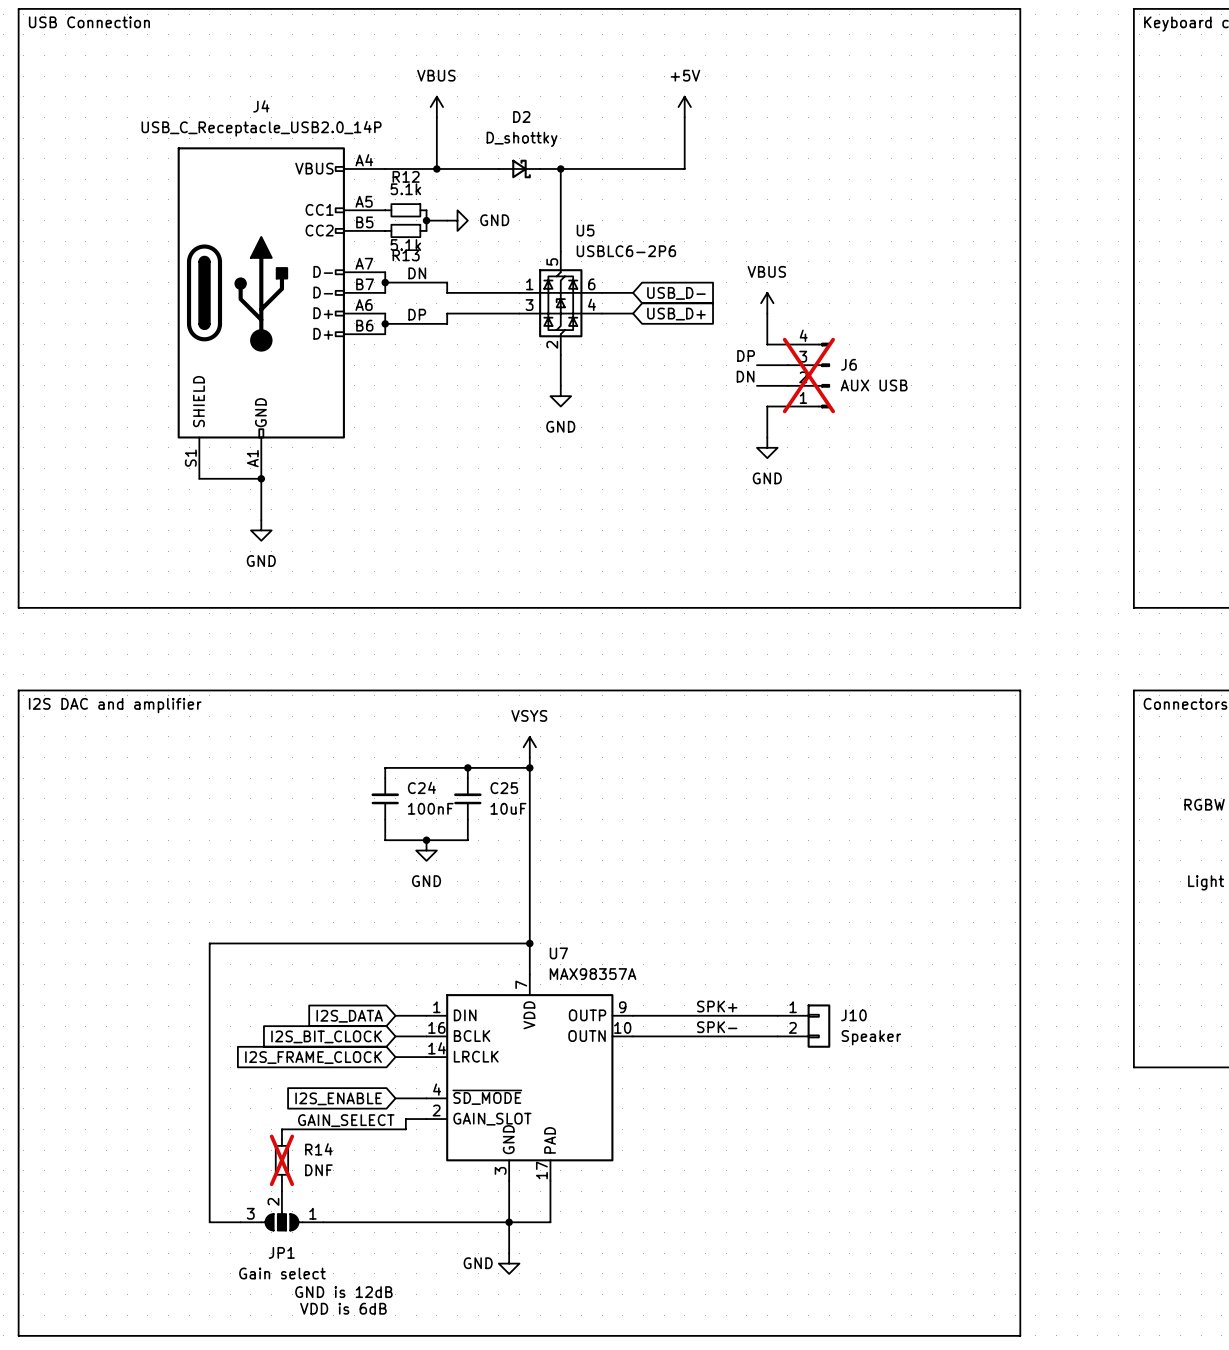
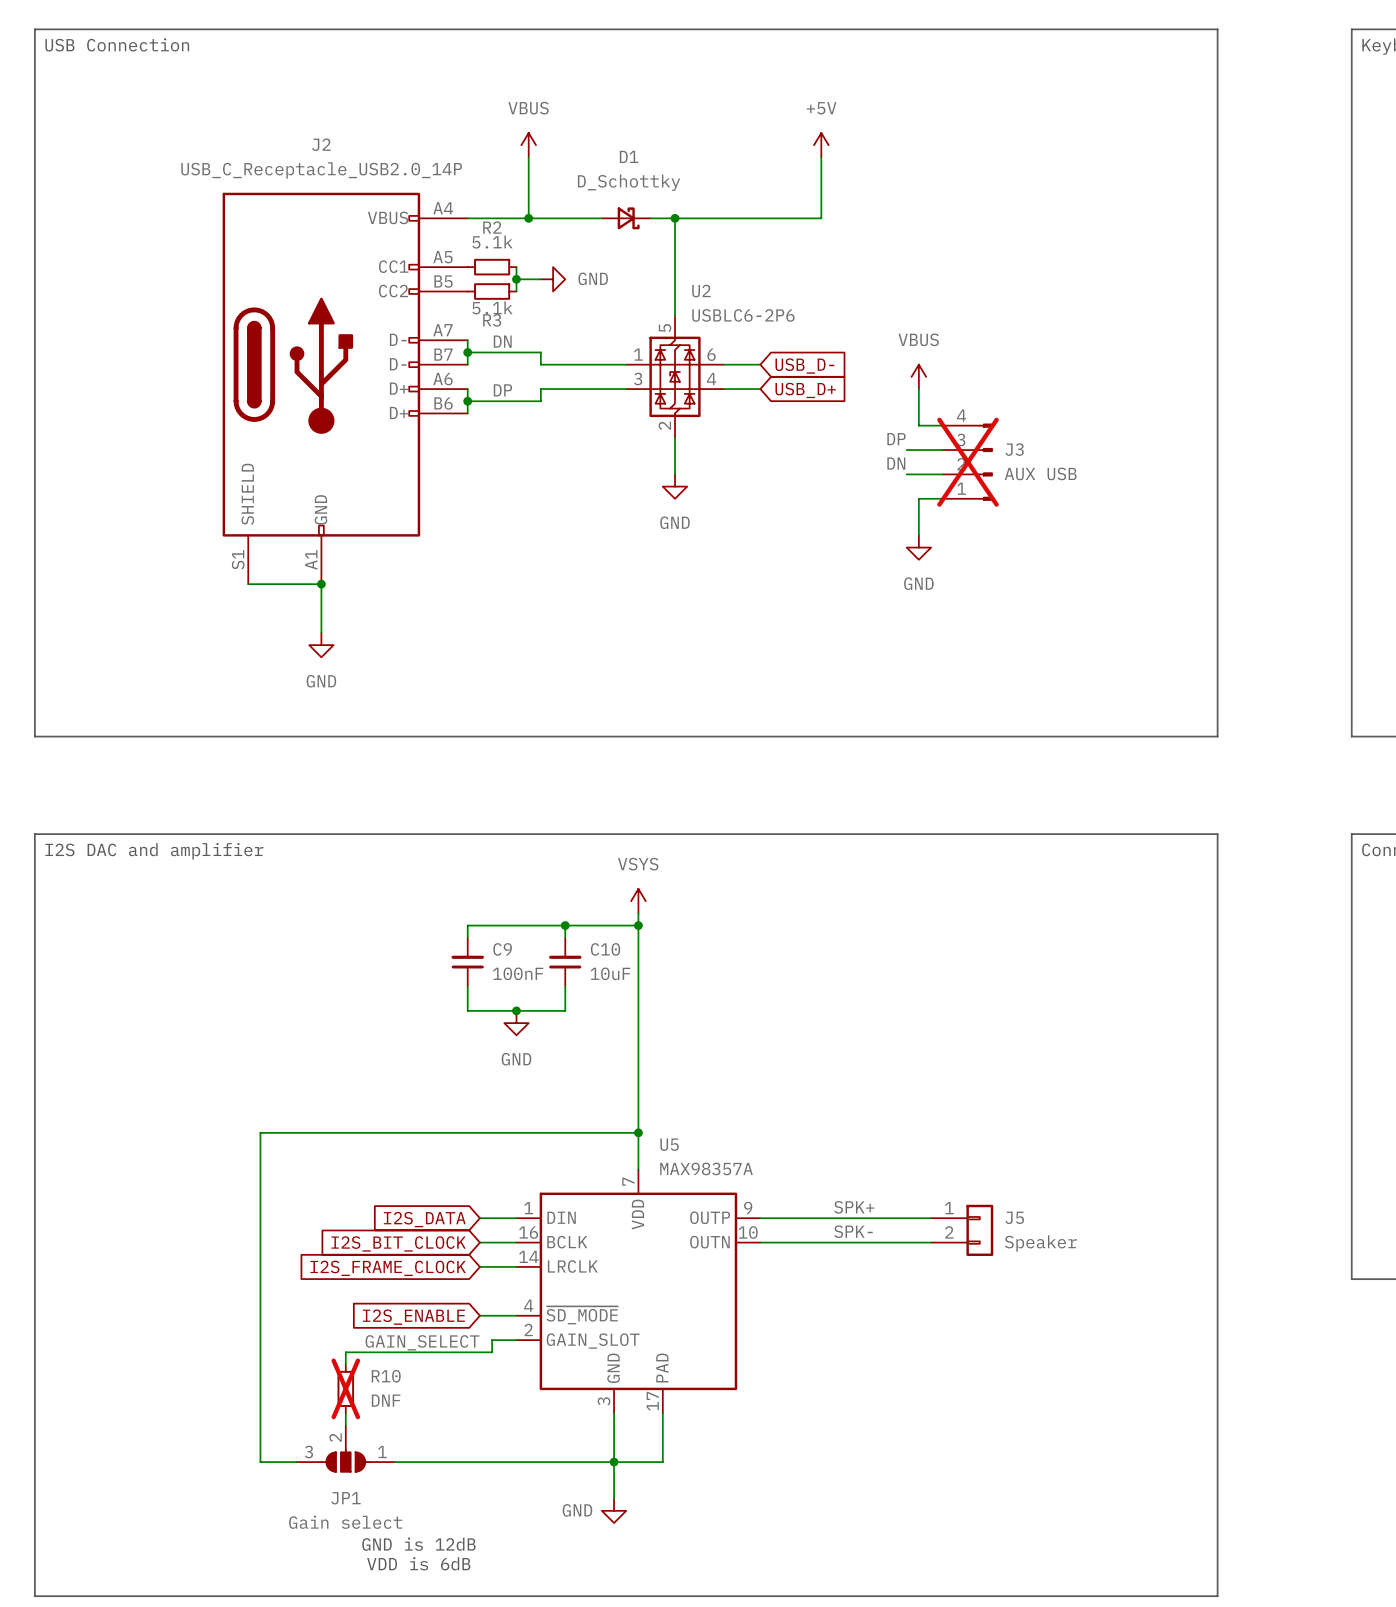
J4 name: J4 (261, 106) -> J2 (321, 144)
D2 name: D2 (521, 116) -> D1 (629, 156)
D2 value: D_shottky (522, 139) -> D_Schottky (629, 182)
R12 name: R12 (406, 176) -> R2 (492, 227)
U5 name: U5 (585, 230) -> U2 (701, 291)
R13 name: R13 (406, 255) -> R3 (492, 320)
J6 name: J6 (849, 364) -> J3 (1014, 449)
C24 name: C24 (421, 787) -> C9 (502, 949)
C25 name: C25 (504, 788) -> C10 (605, 949)
U7 name: U7 (558, 953) -> U5 (669, 1144)
J10 name: J10 (853, 1015) -> J5 (1014, 1217)
R14 name: R14 (318, 1149) -> R10 (386, 1376)

